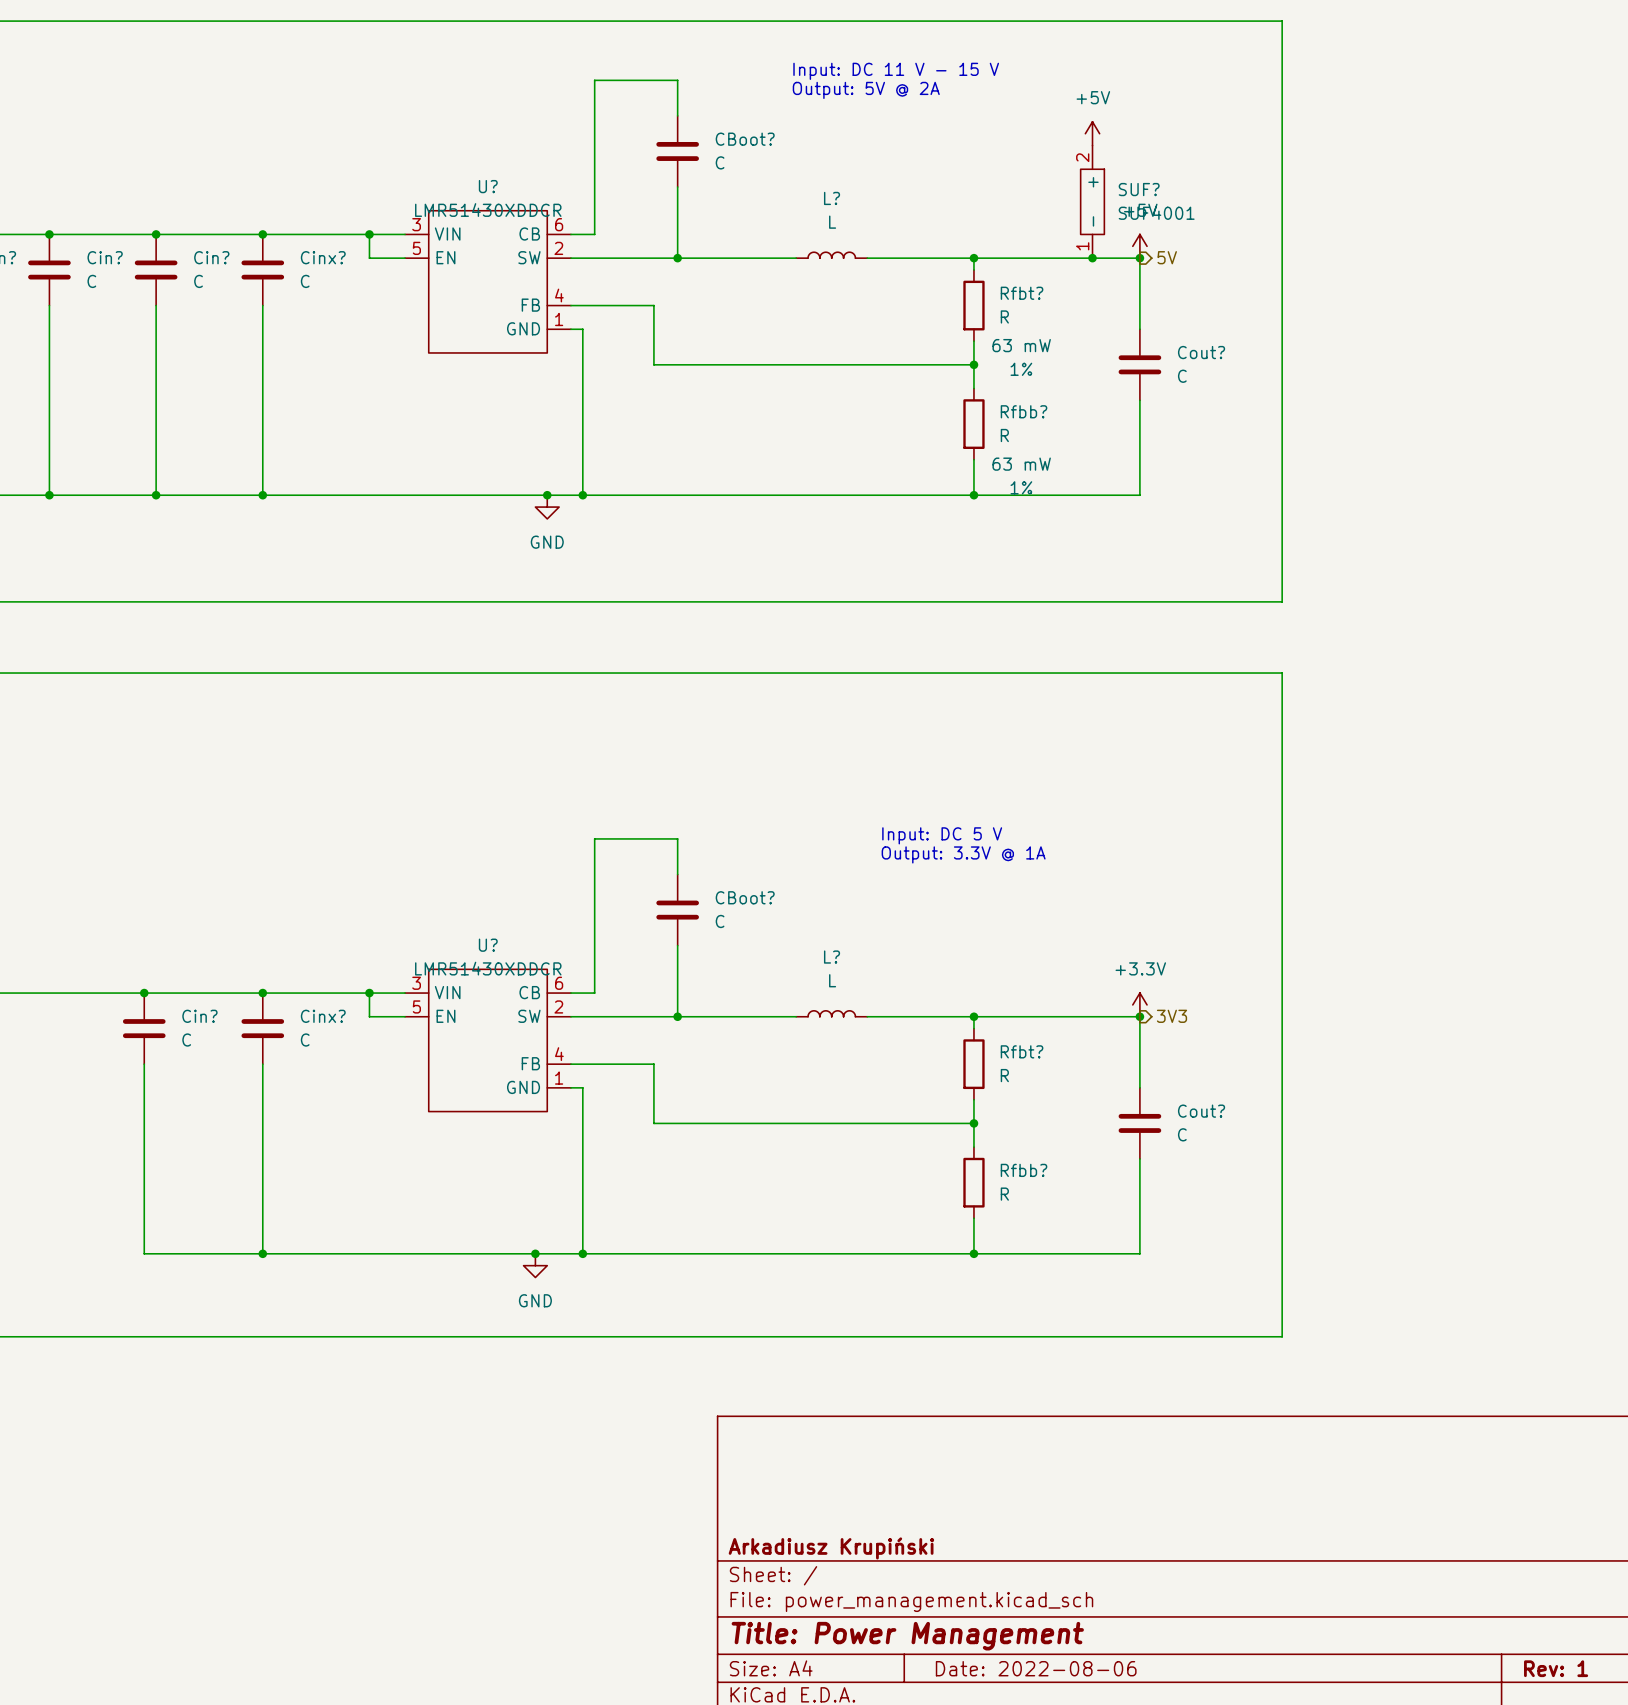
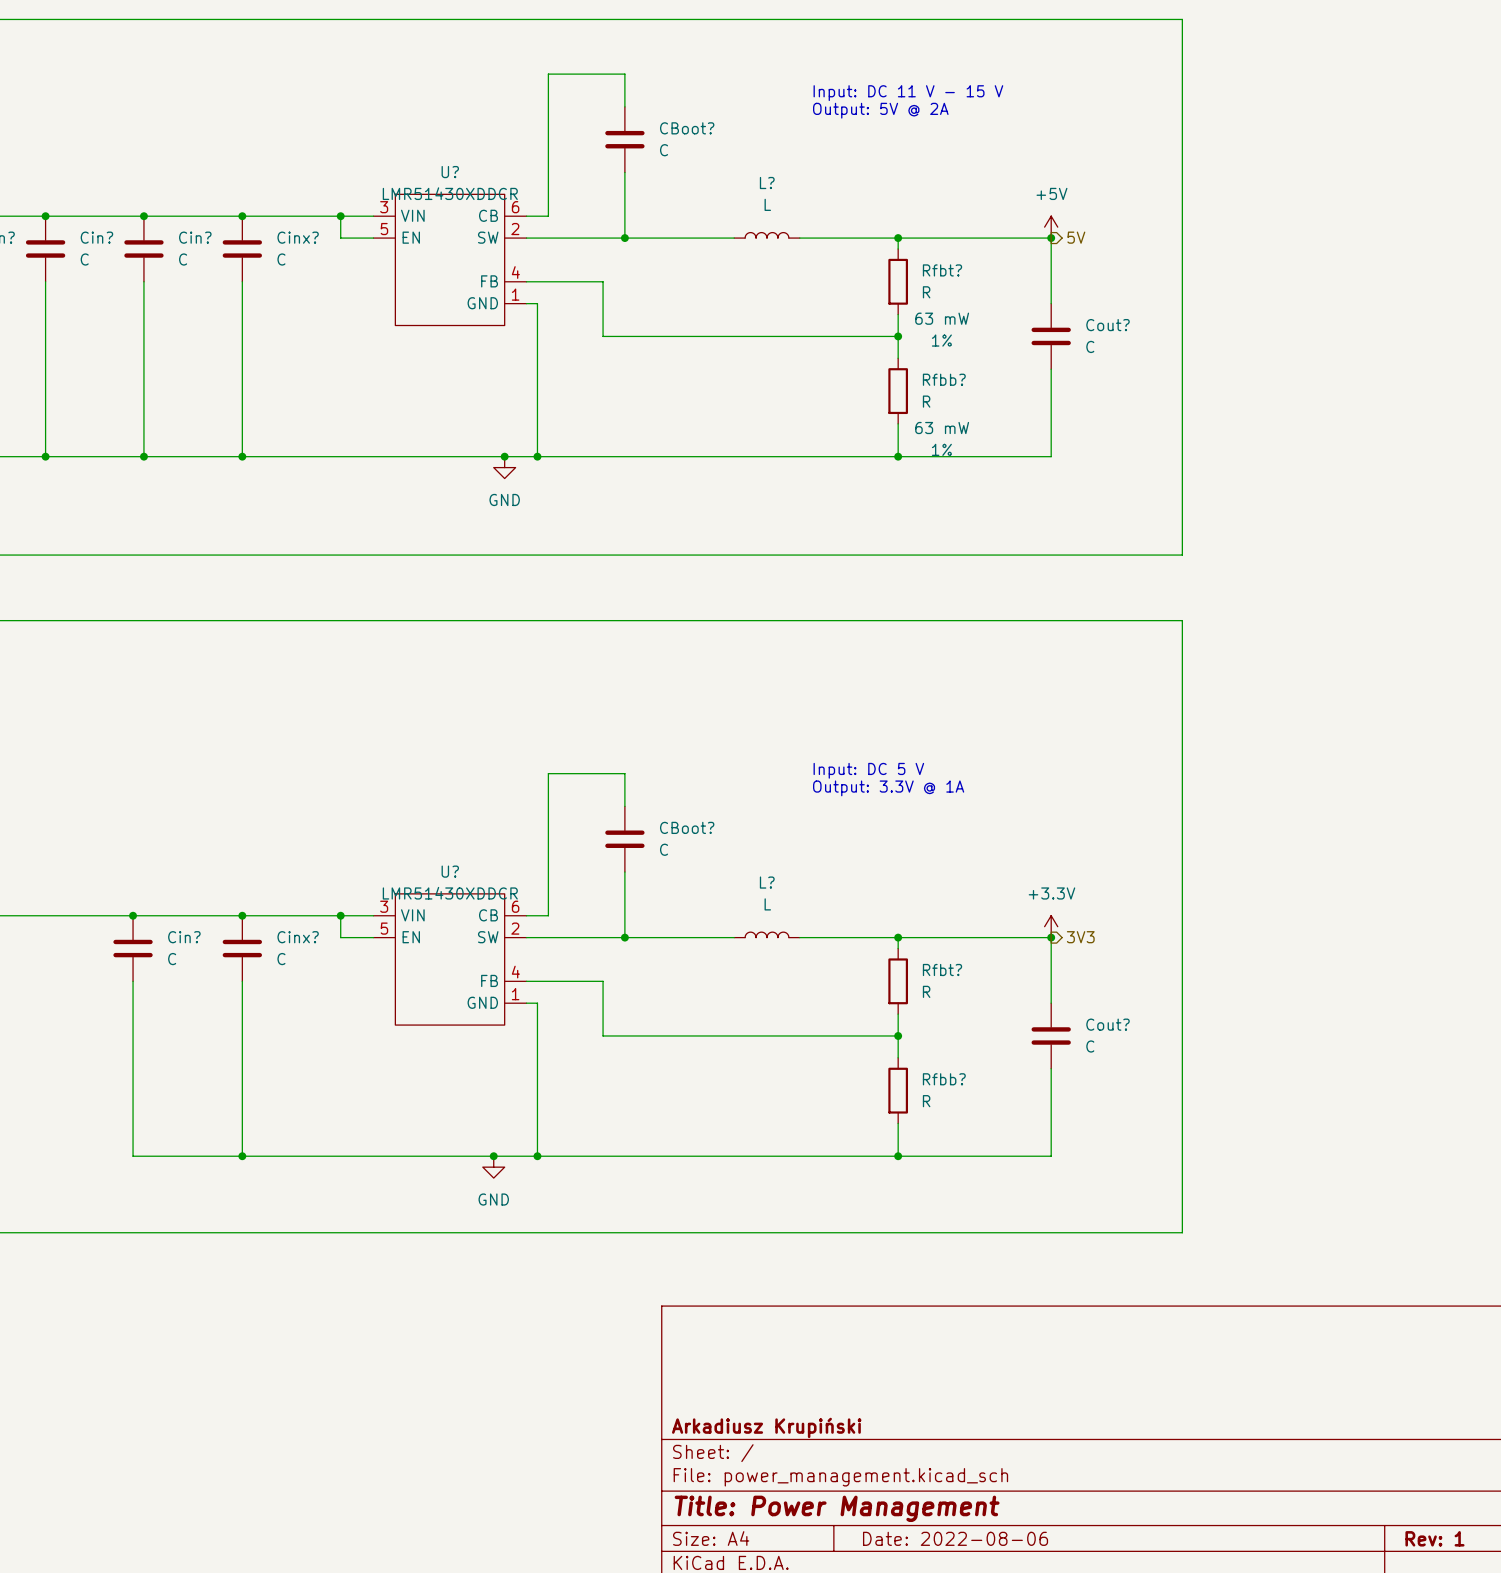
text position: Input: DC 11 V - 15 V (896, 71) -> Input: DC 11 V - 15 V (908, 93)
text position: Output: 5V @ 2A (866, 90) -> Output: 5V @ 2A (880, 110)
power symbol: +5V (1092, 133) -> none
SUF?: SUF4001 (1092, 201) -> none
junction: (1092, 258) -> none

